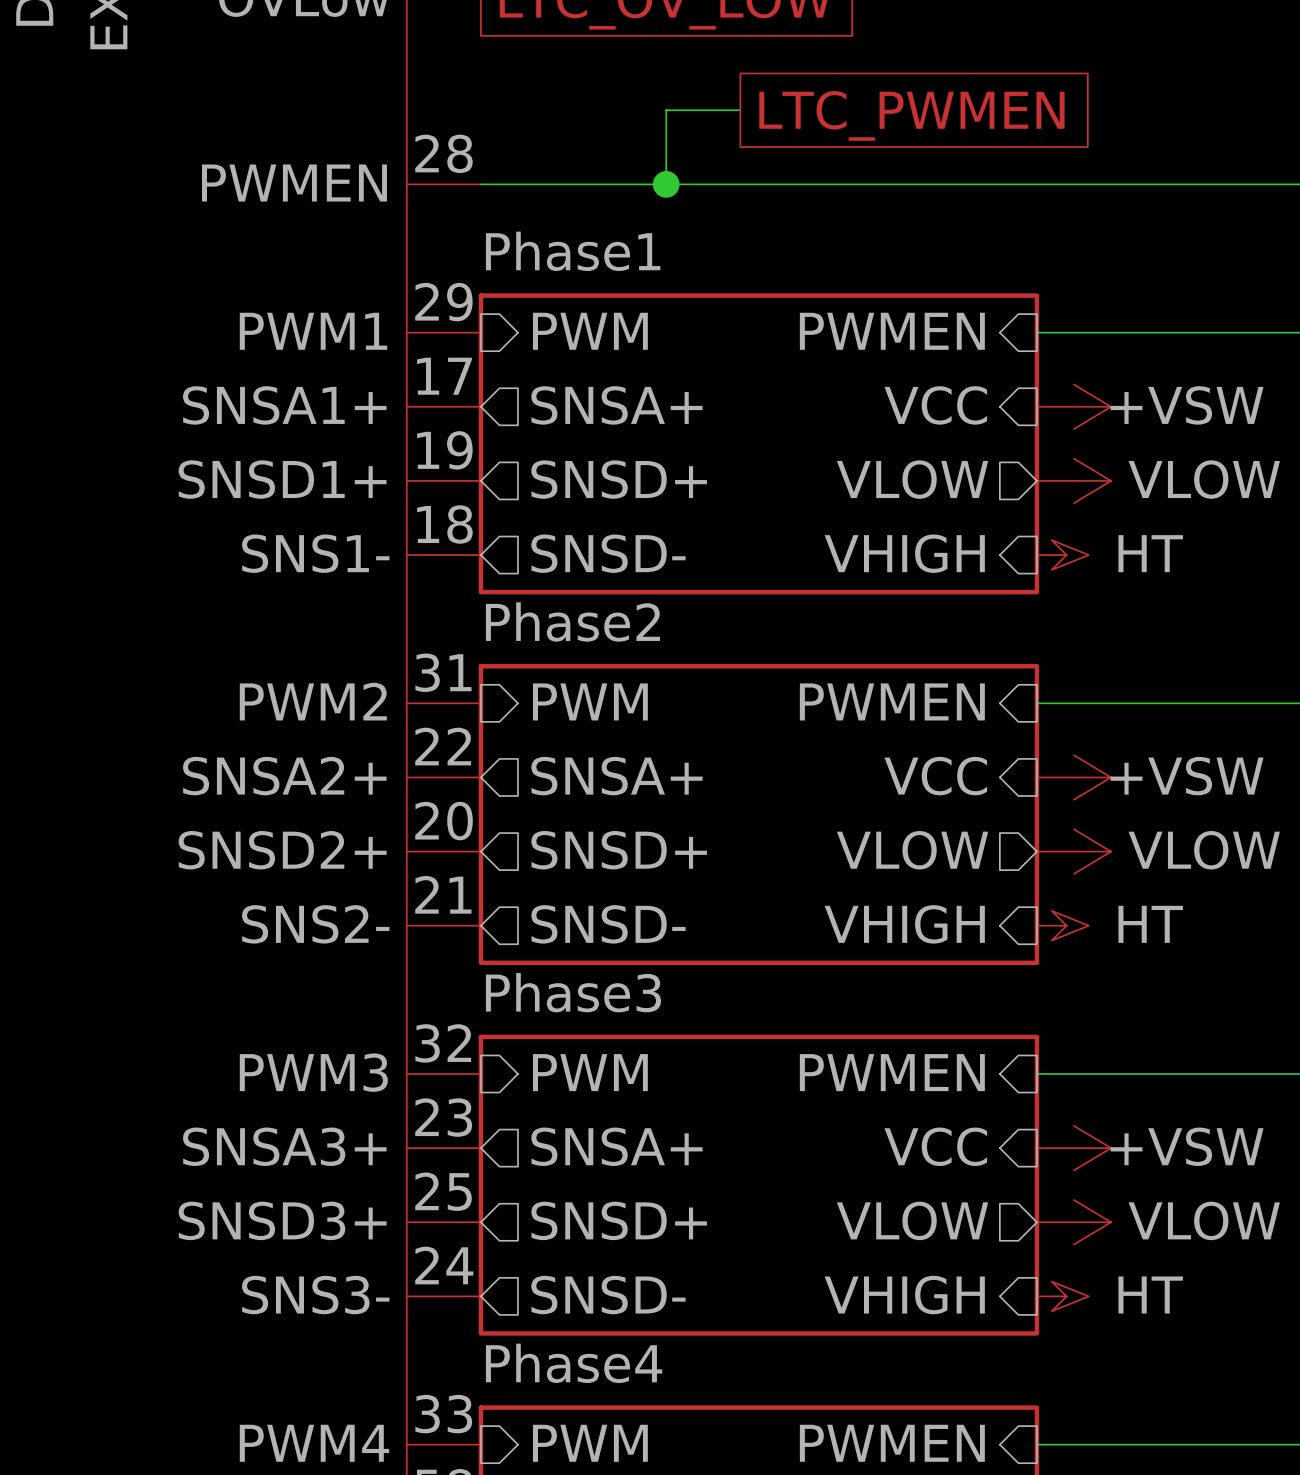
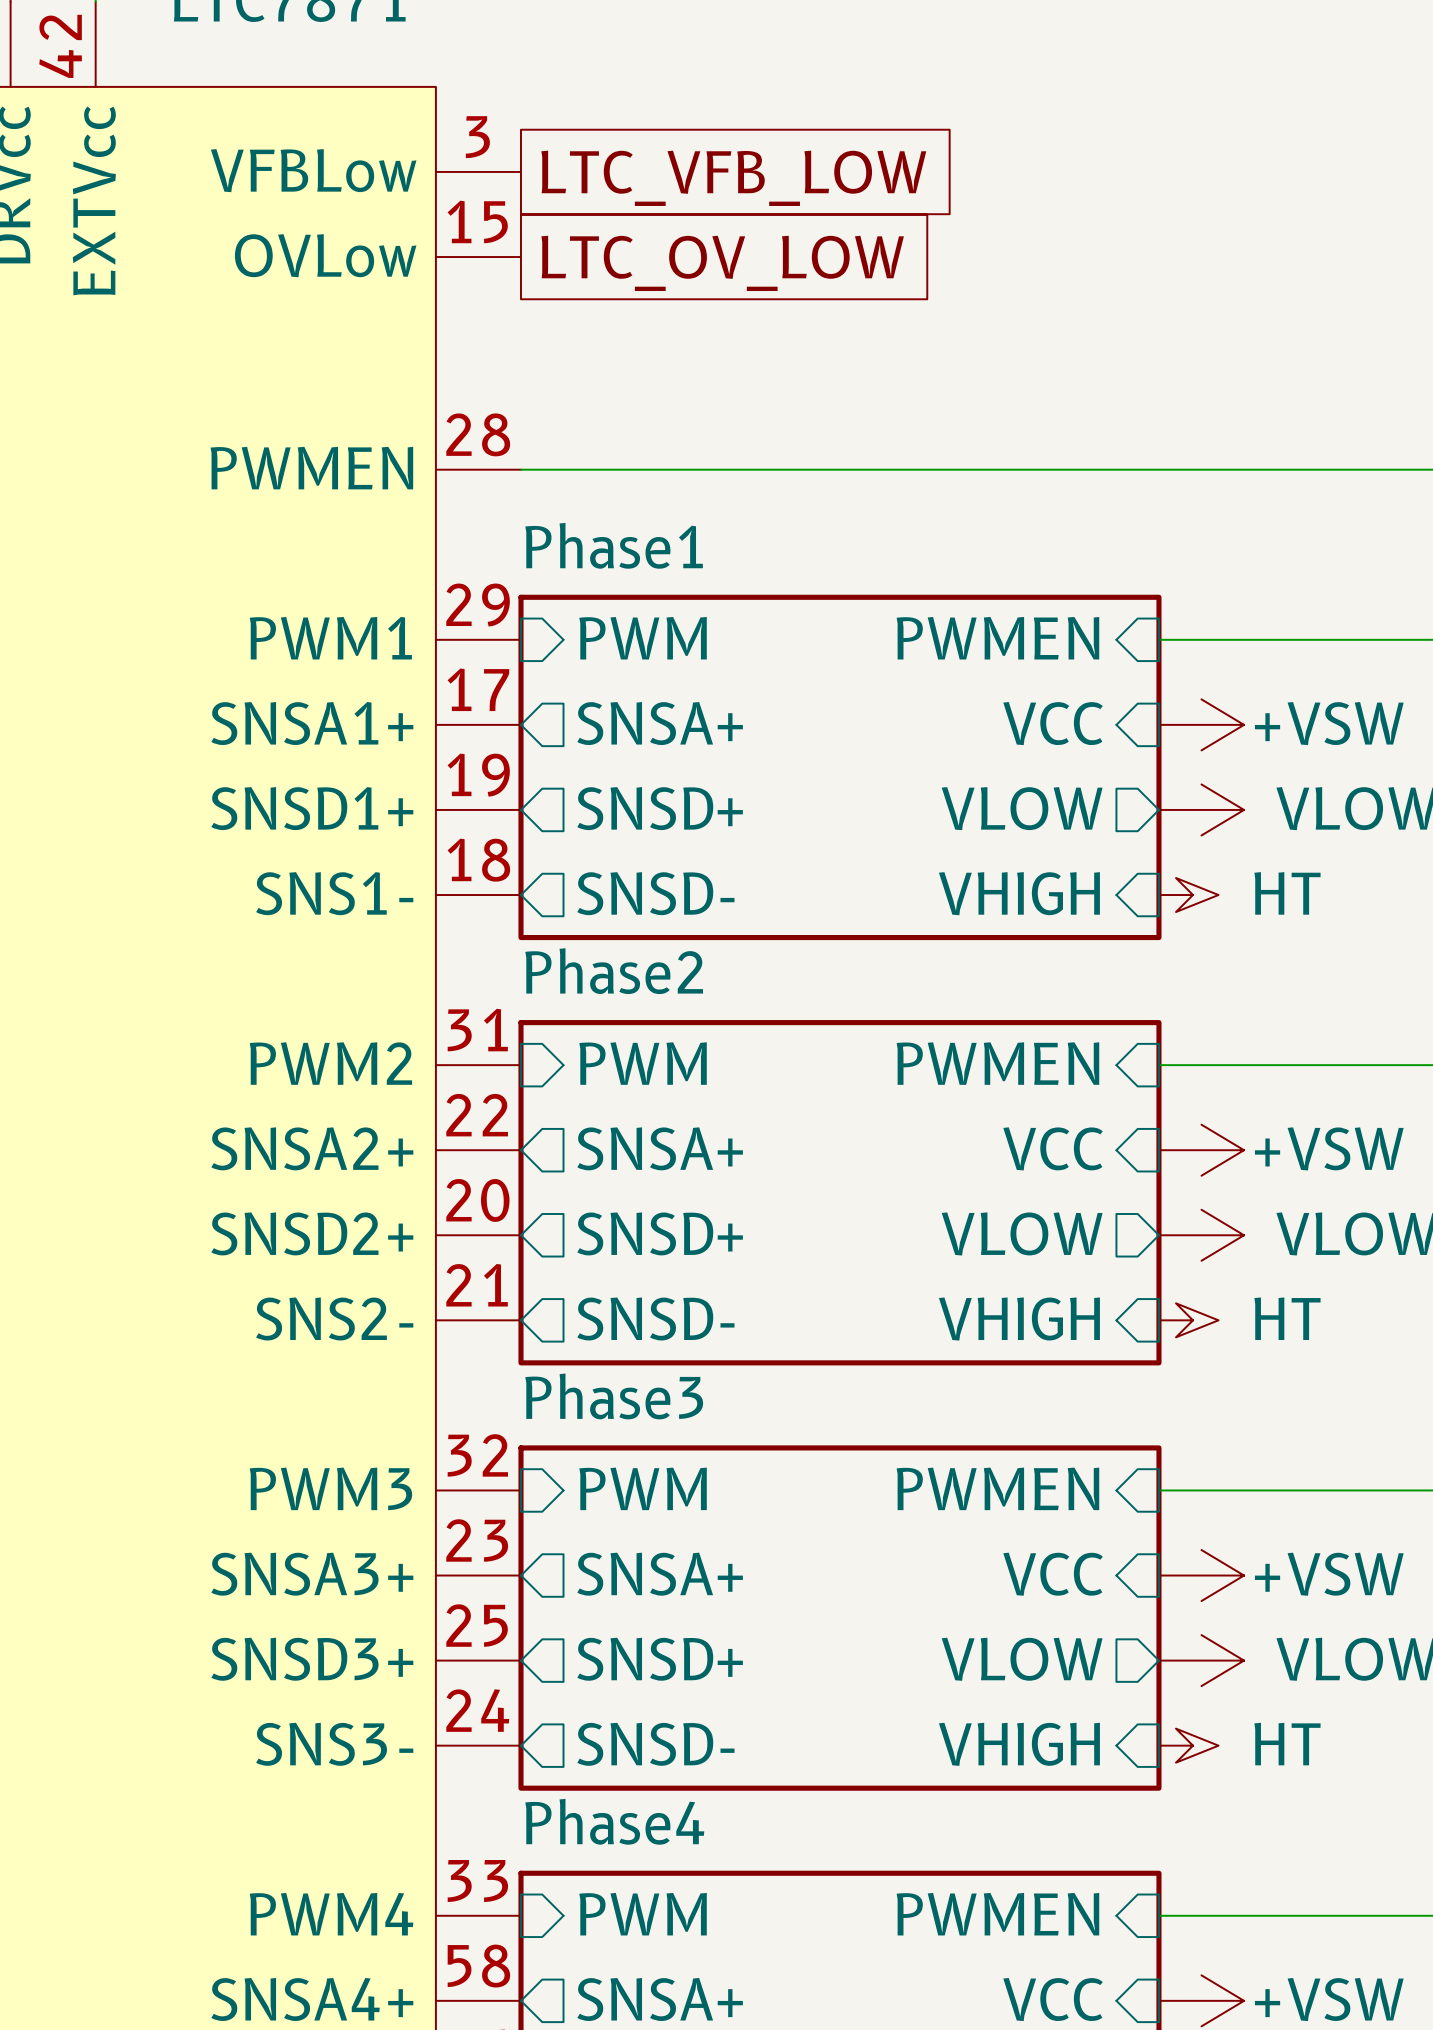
wire: (740, 110) (666, 110) (666, 184) -> none
global label: LTC_PWMEN (911, 115) -> none
junction: (666, 184) -> none

